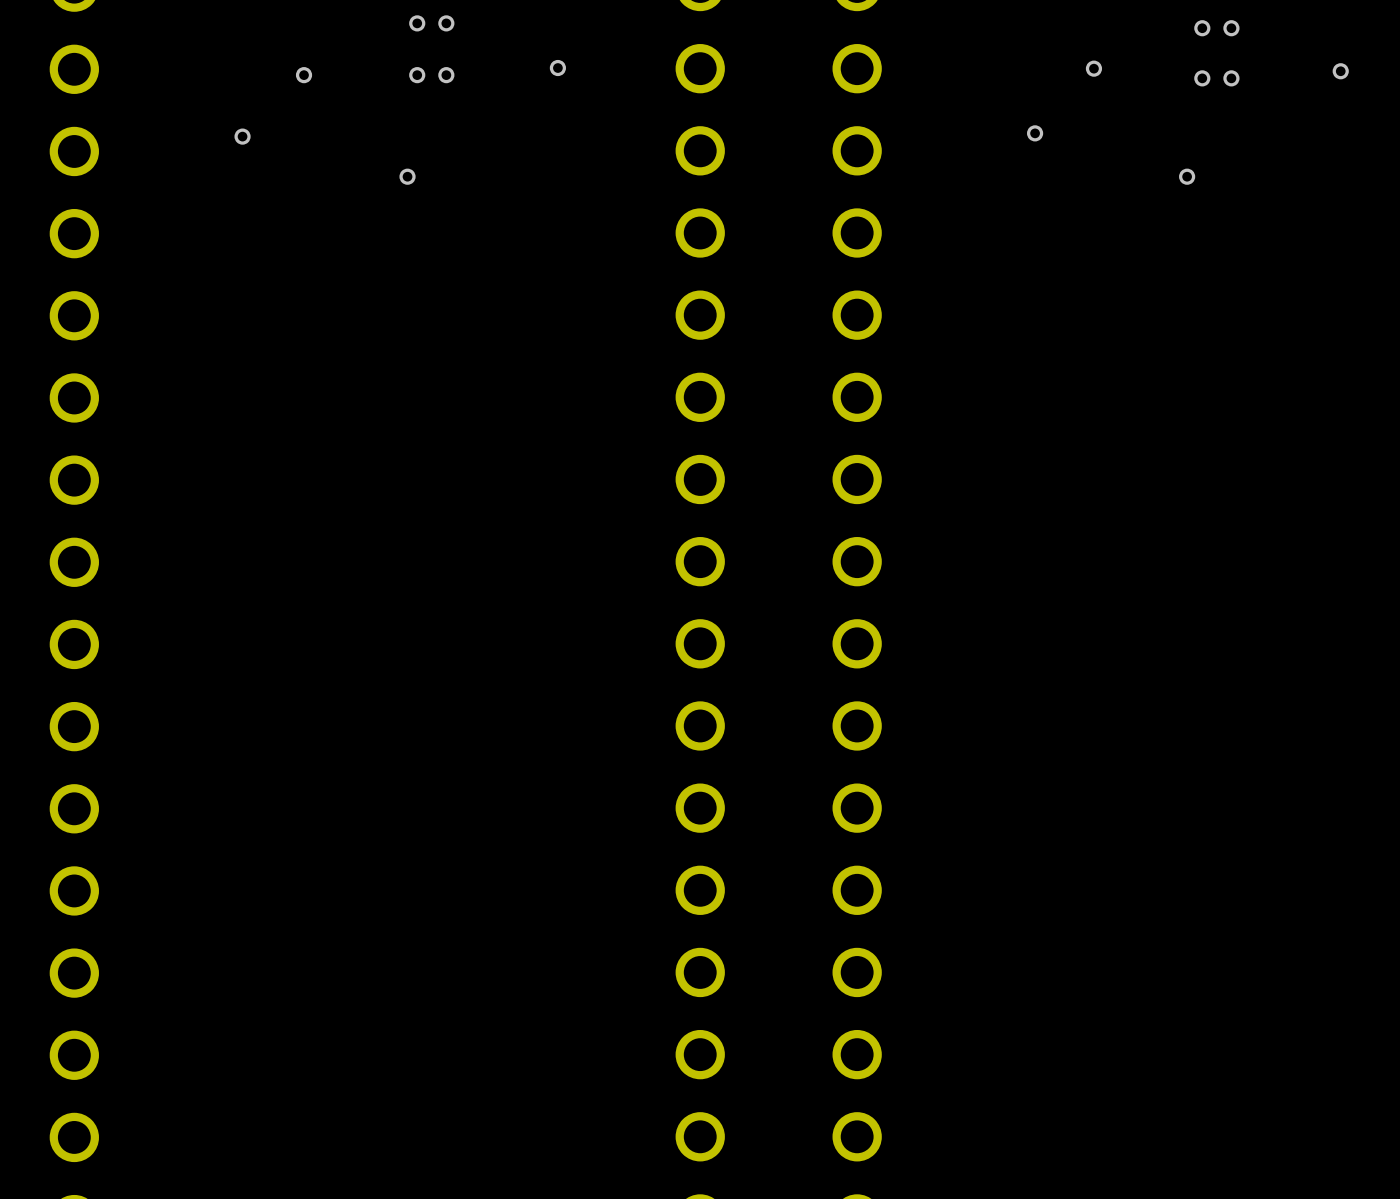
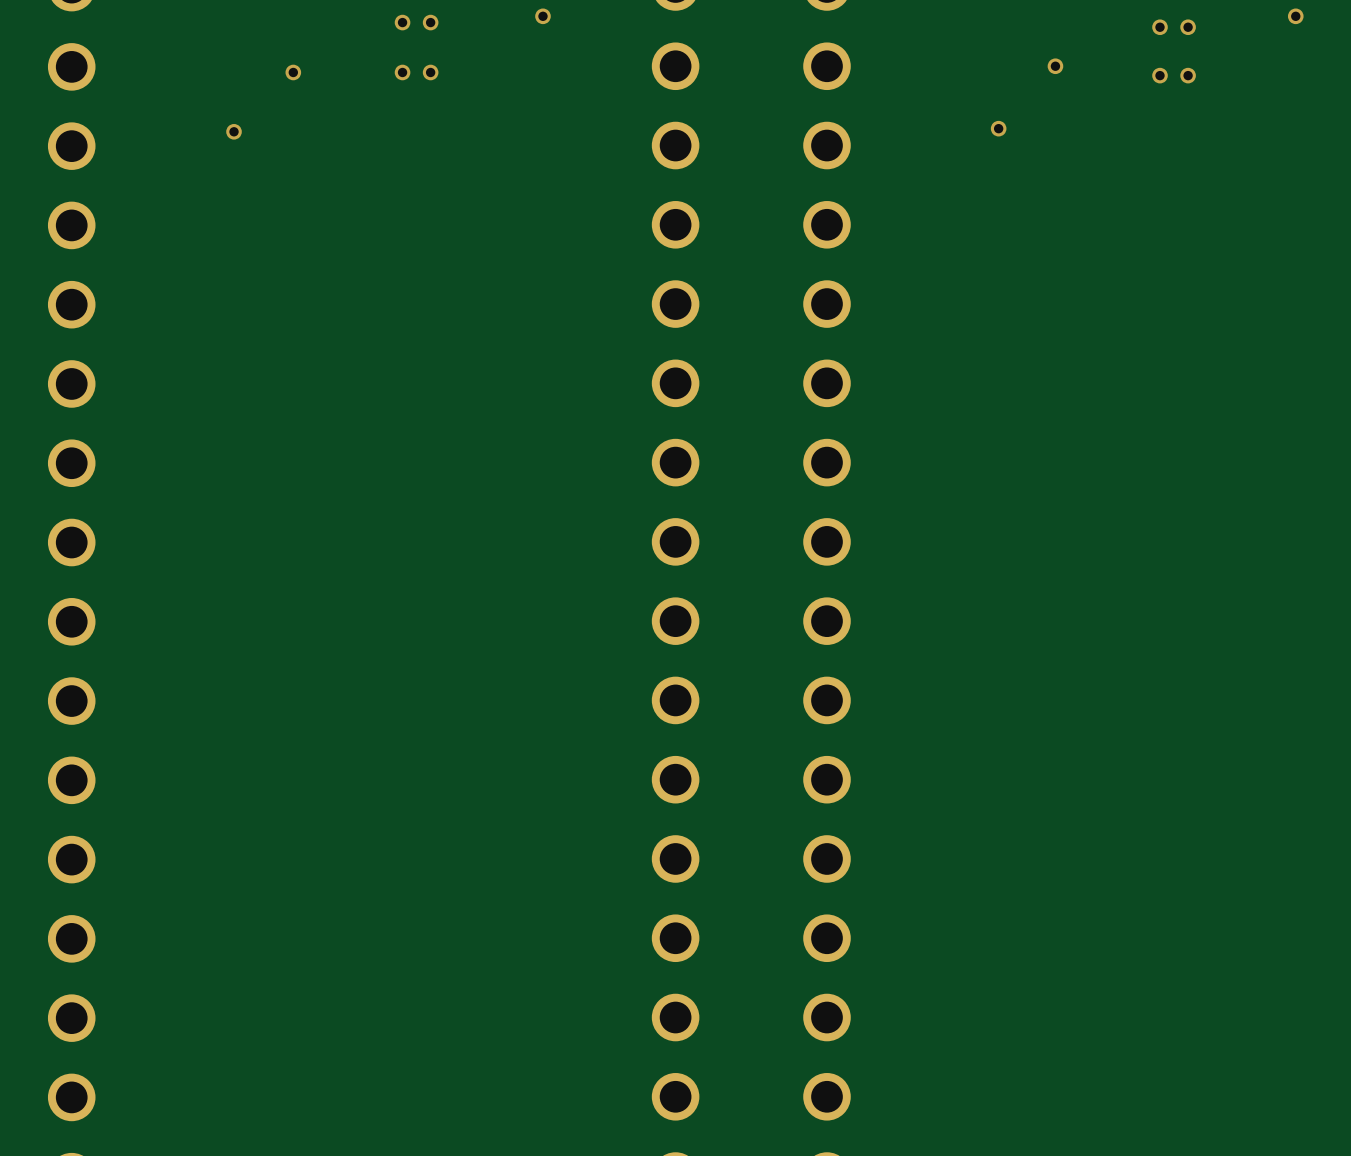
via position: (557, 68) -> (542, 16)
via position: (1340, 71) -> (1295, 16)
via: (407, 176) -> none
via: (1187, 176) -> none

